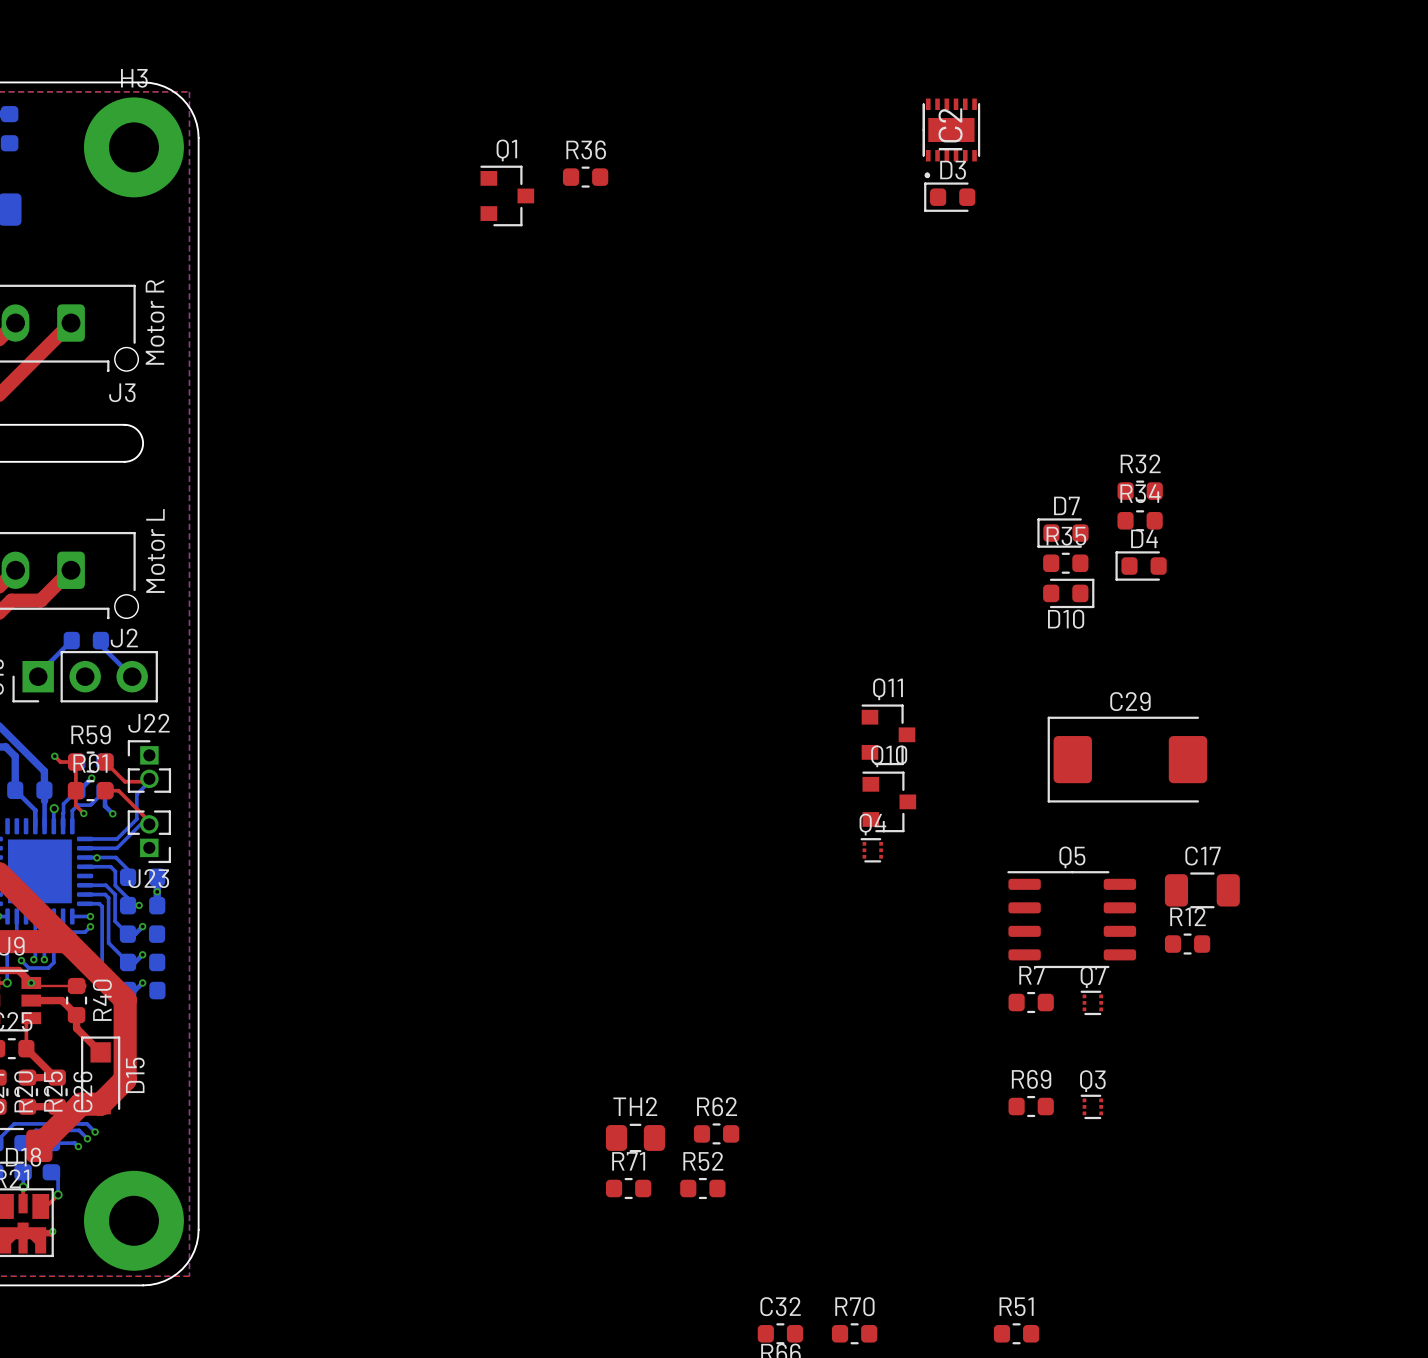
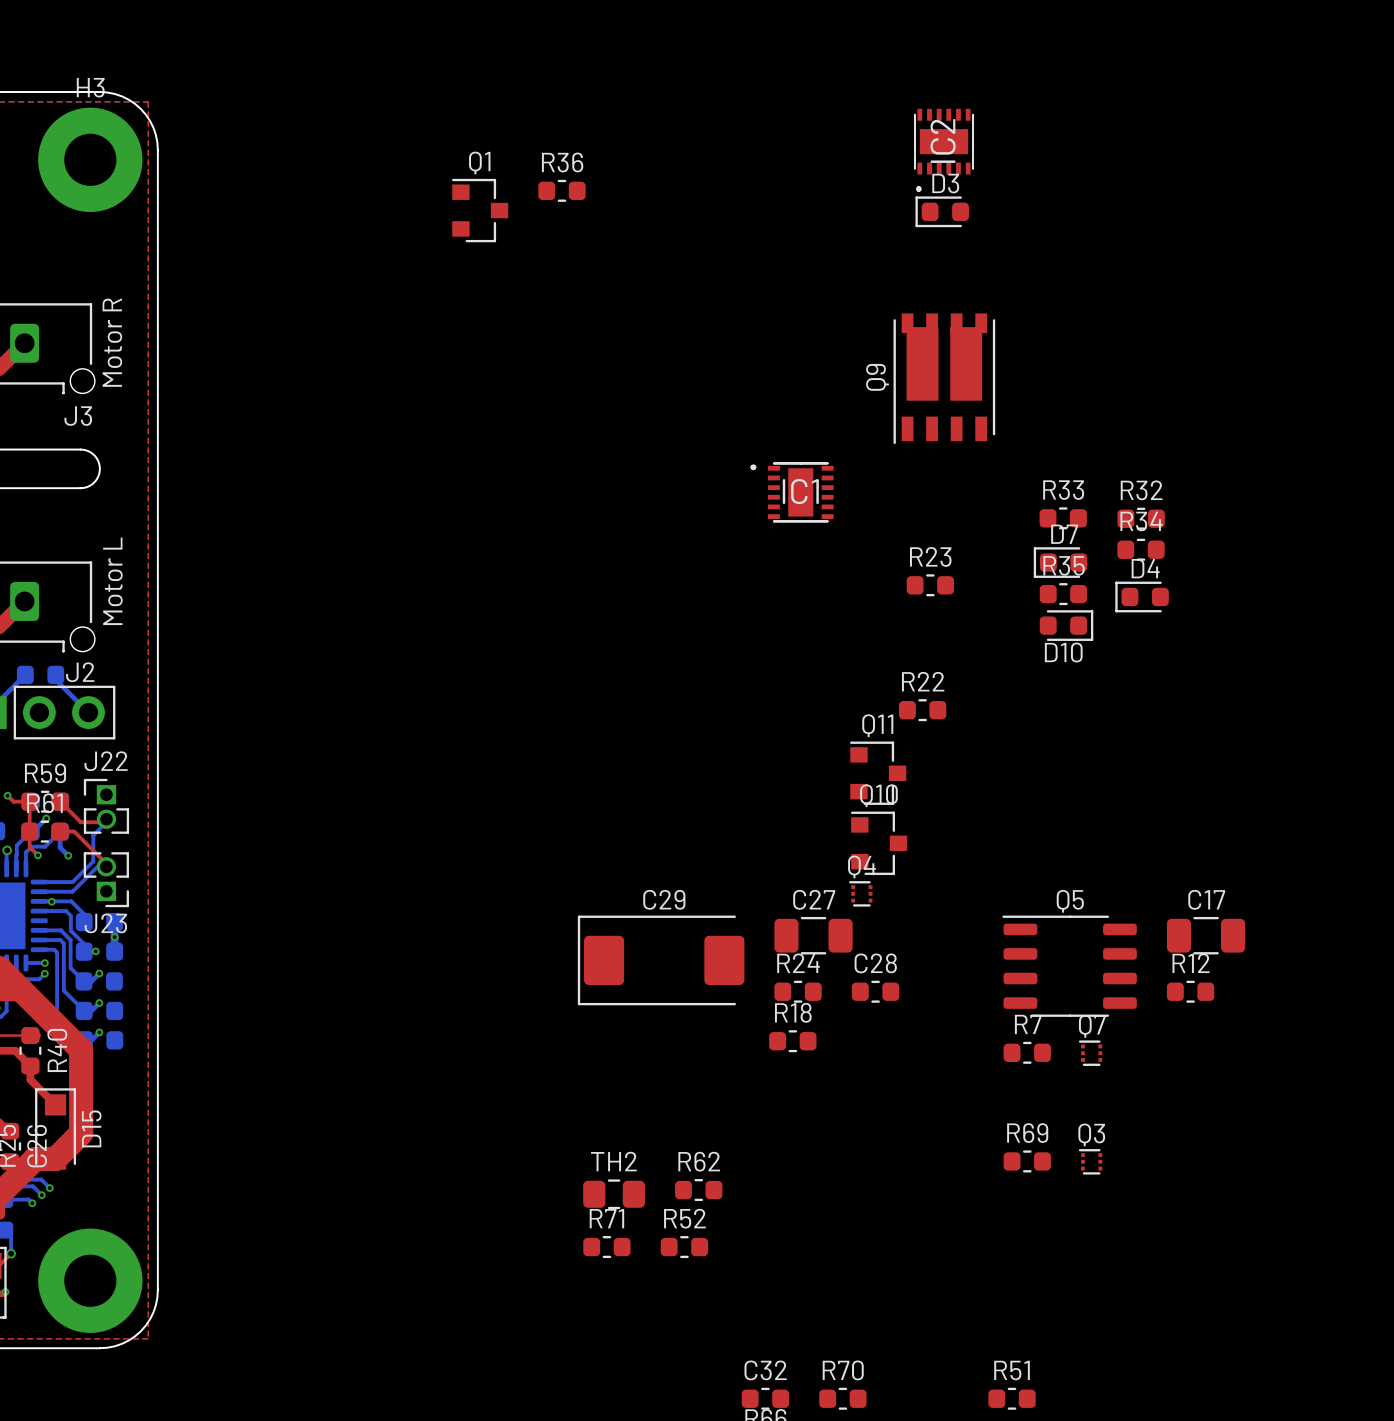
Q9: none -> (944, 378)
IC1: none -> (792, 492)
R33: none -> (1063, 518)
R23: none -> (930, 585)
R22: none -> (922, 710)
C29 position: (1127, 759) -> (661, 960)
C27: none -> (813, 935)
R24: none -> (798, 991)
C28: none -> (875, 991)
R18: none -> (792, 1041)

